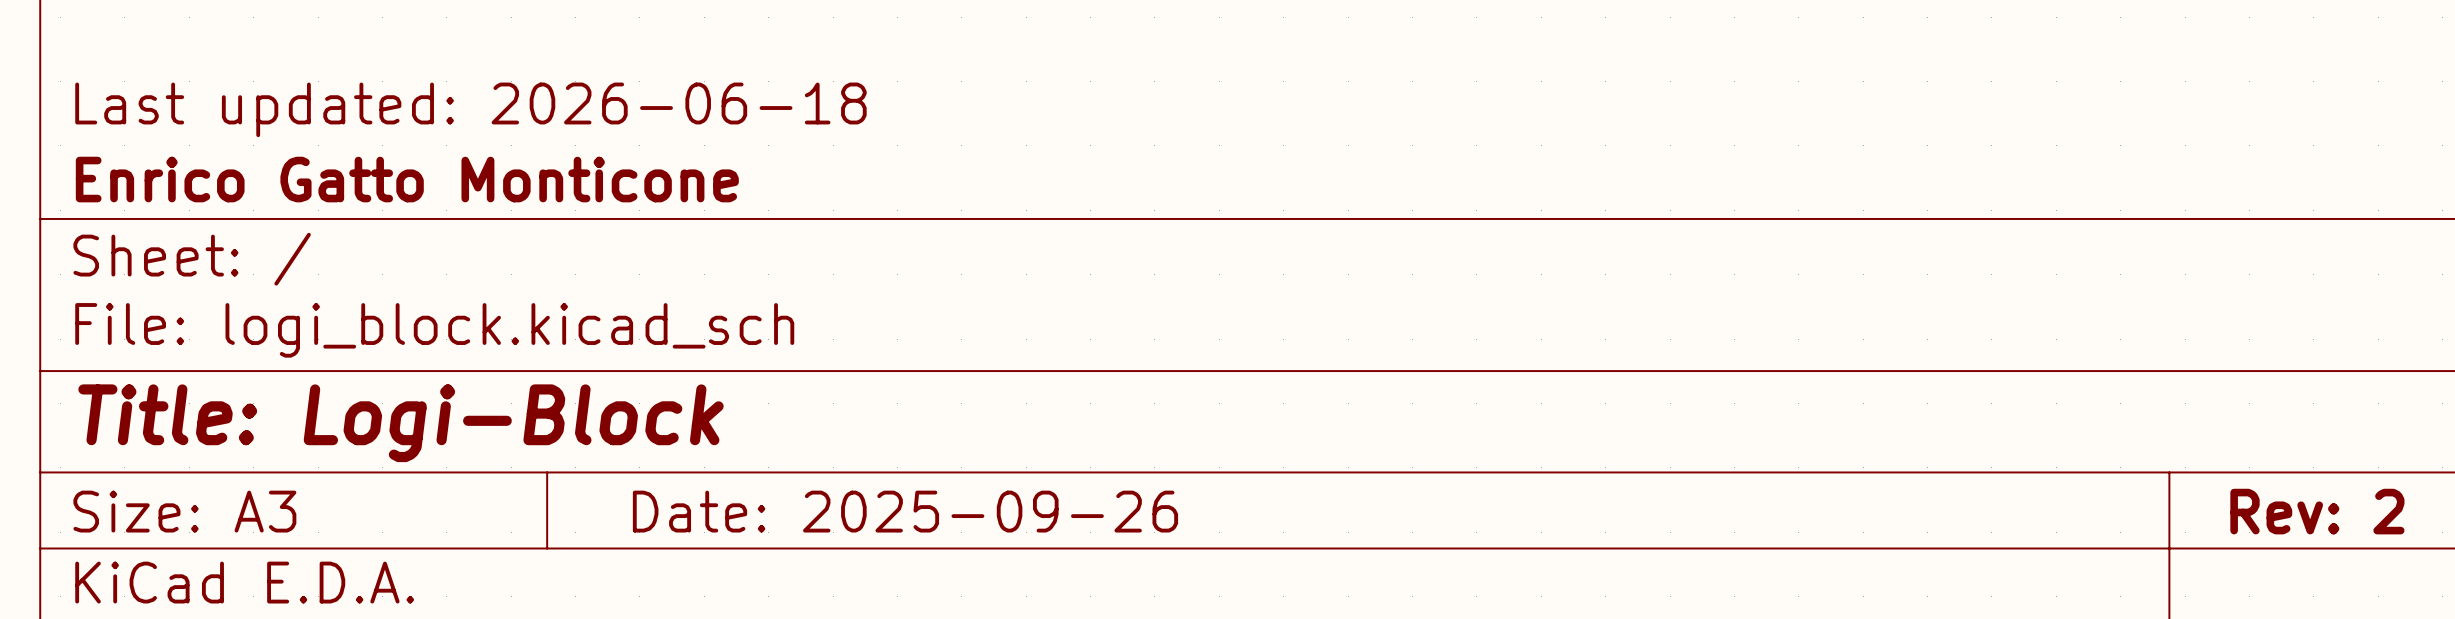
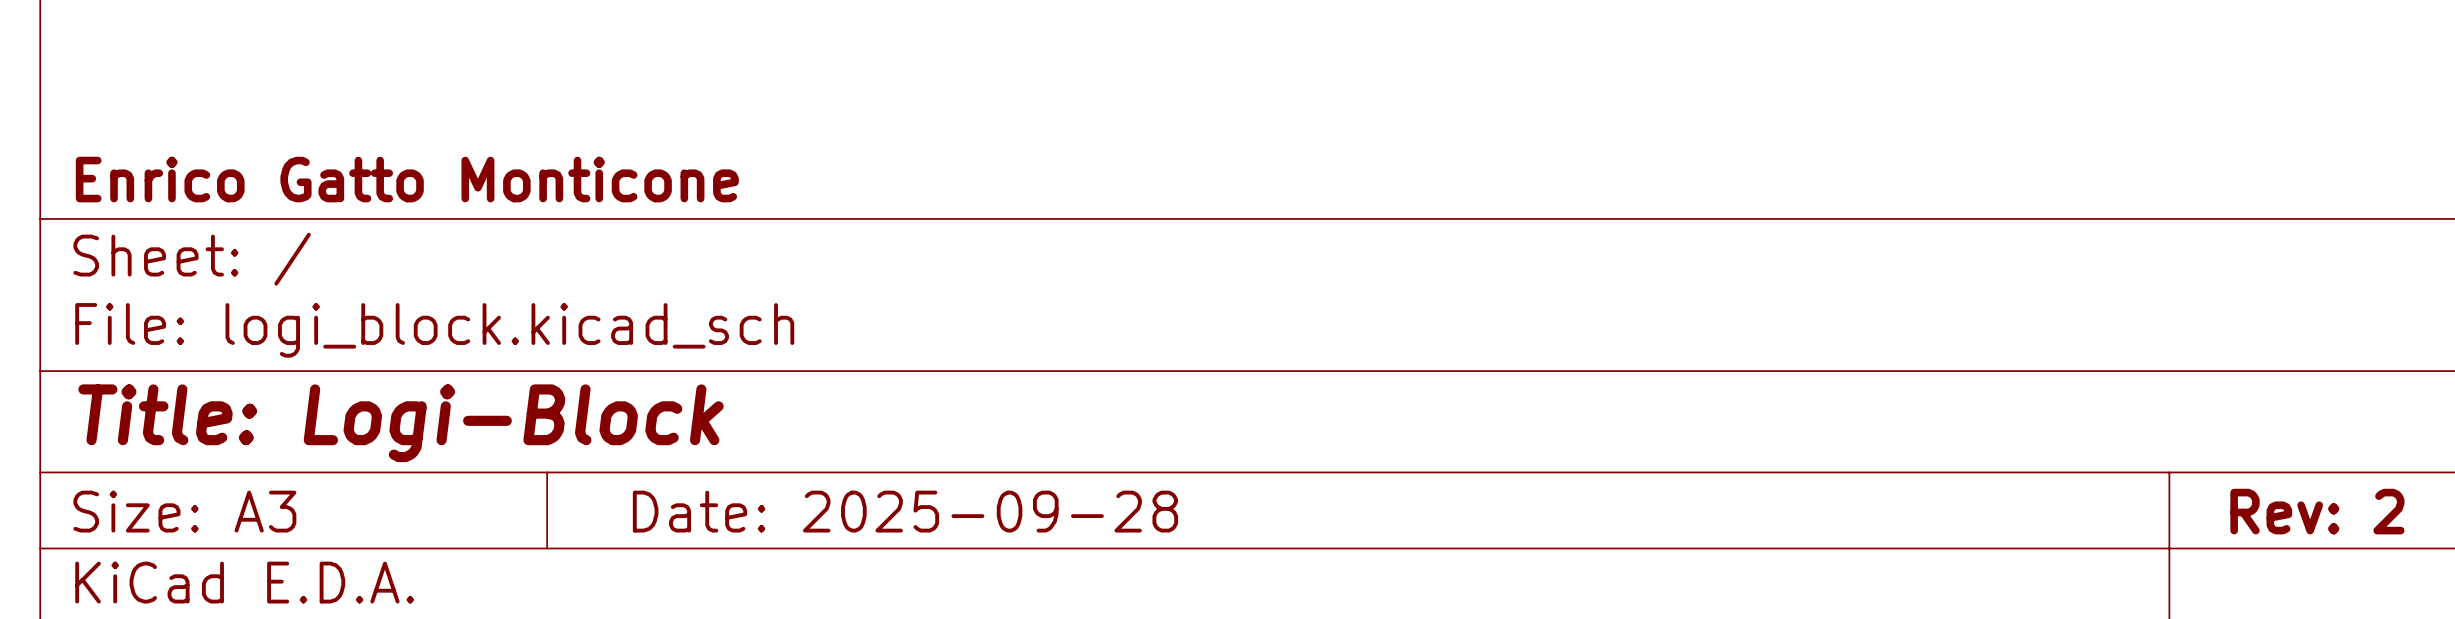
title block: Last updated: 2026-06-18 (470, 109) -> none
title block: Date: 2025-09-26 (905, 511) -> Date: 2025-09-28 (905, 511)

